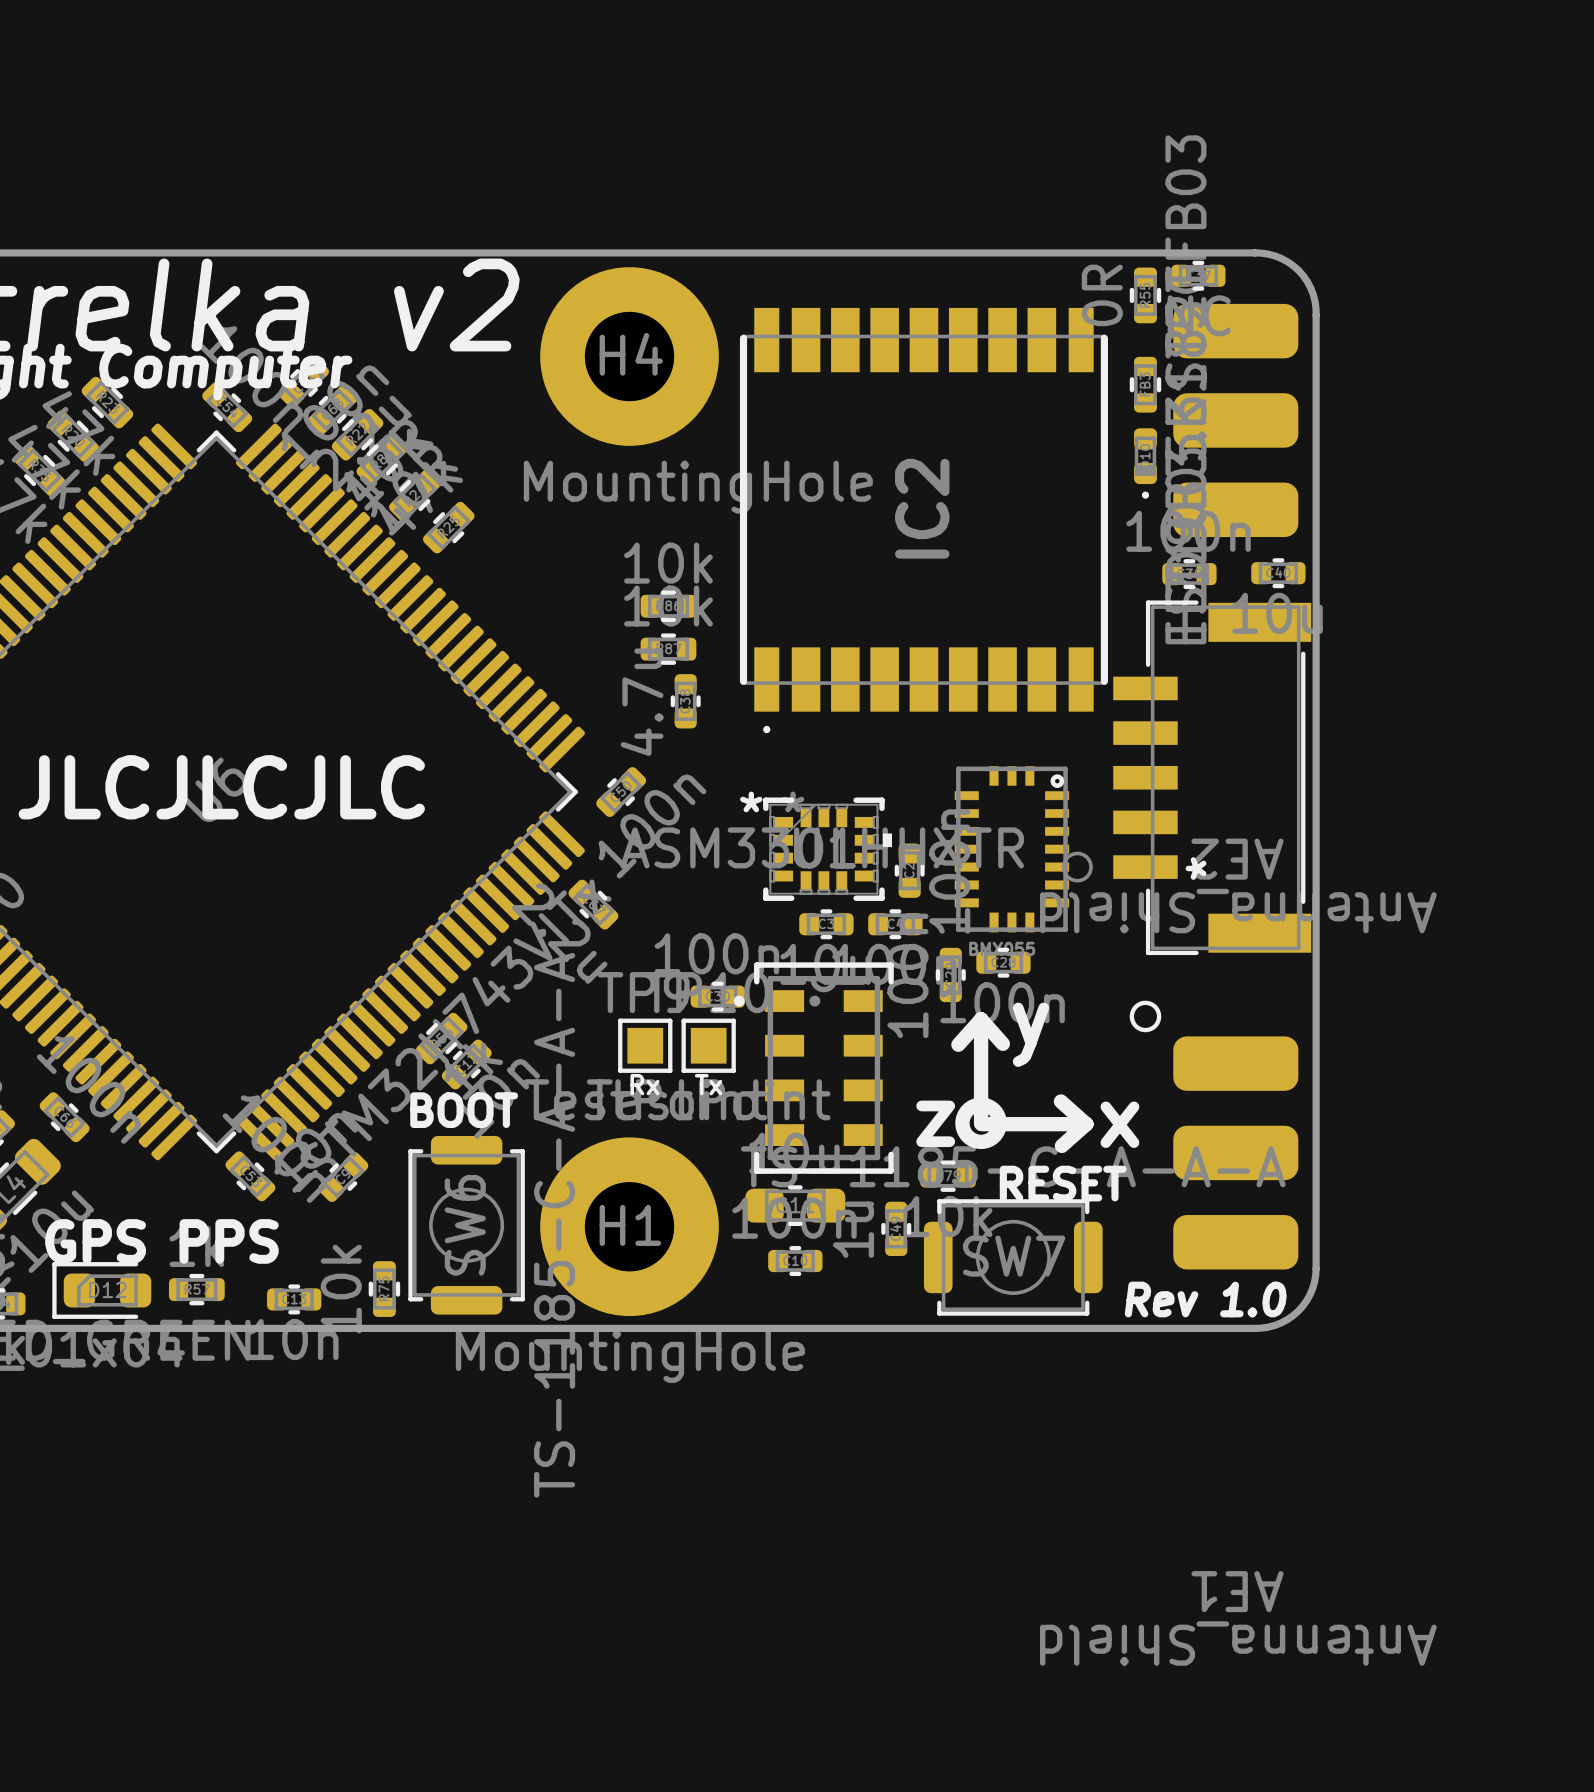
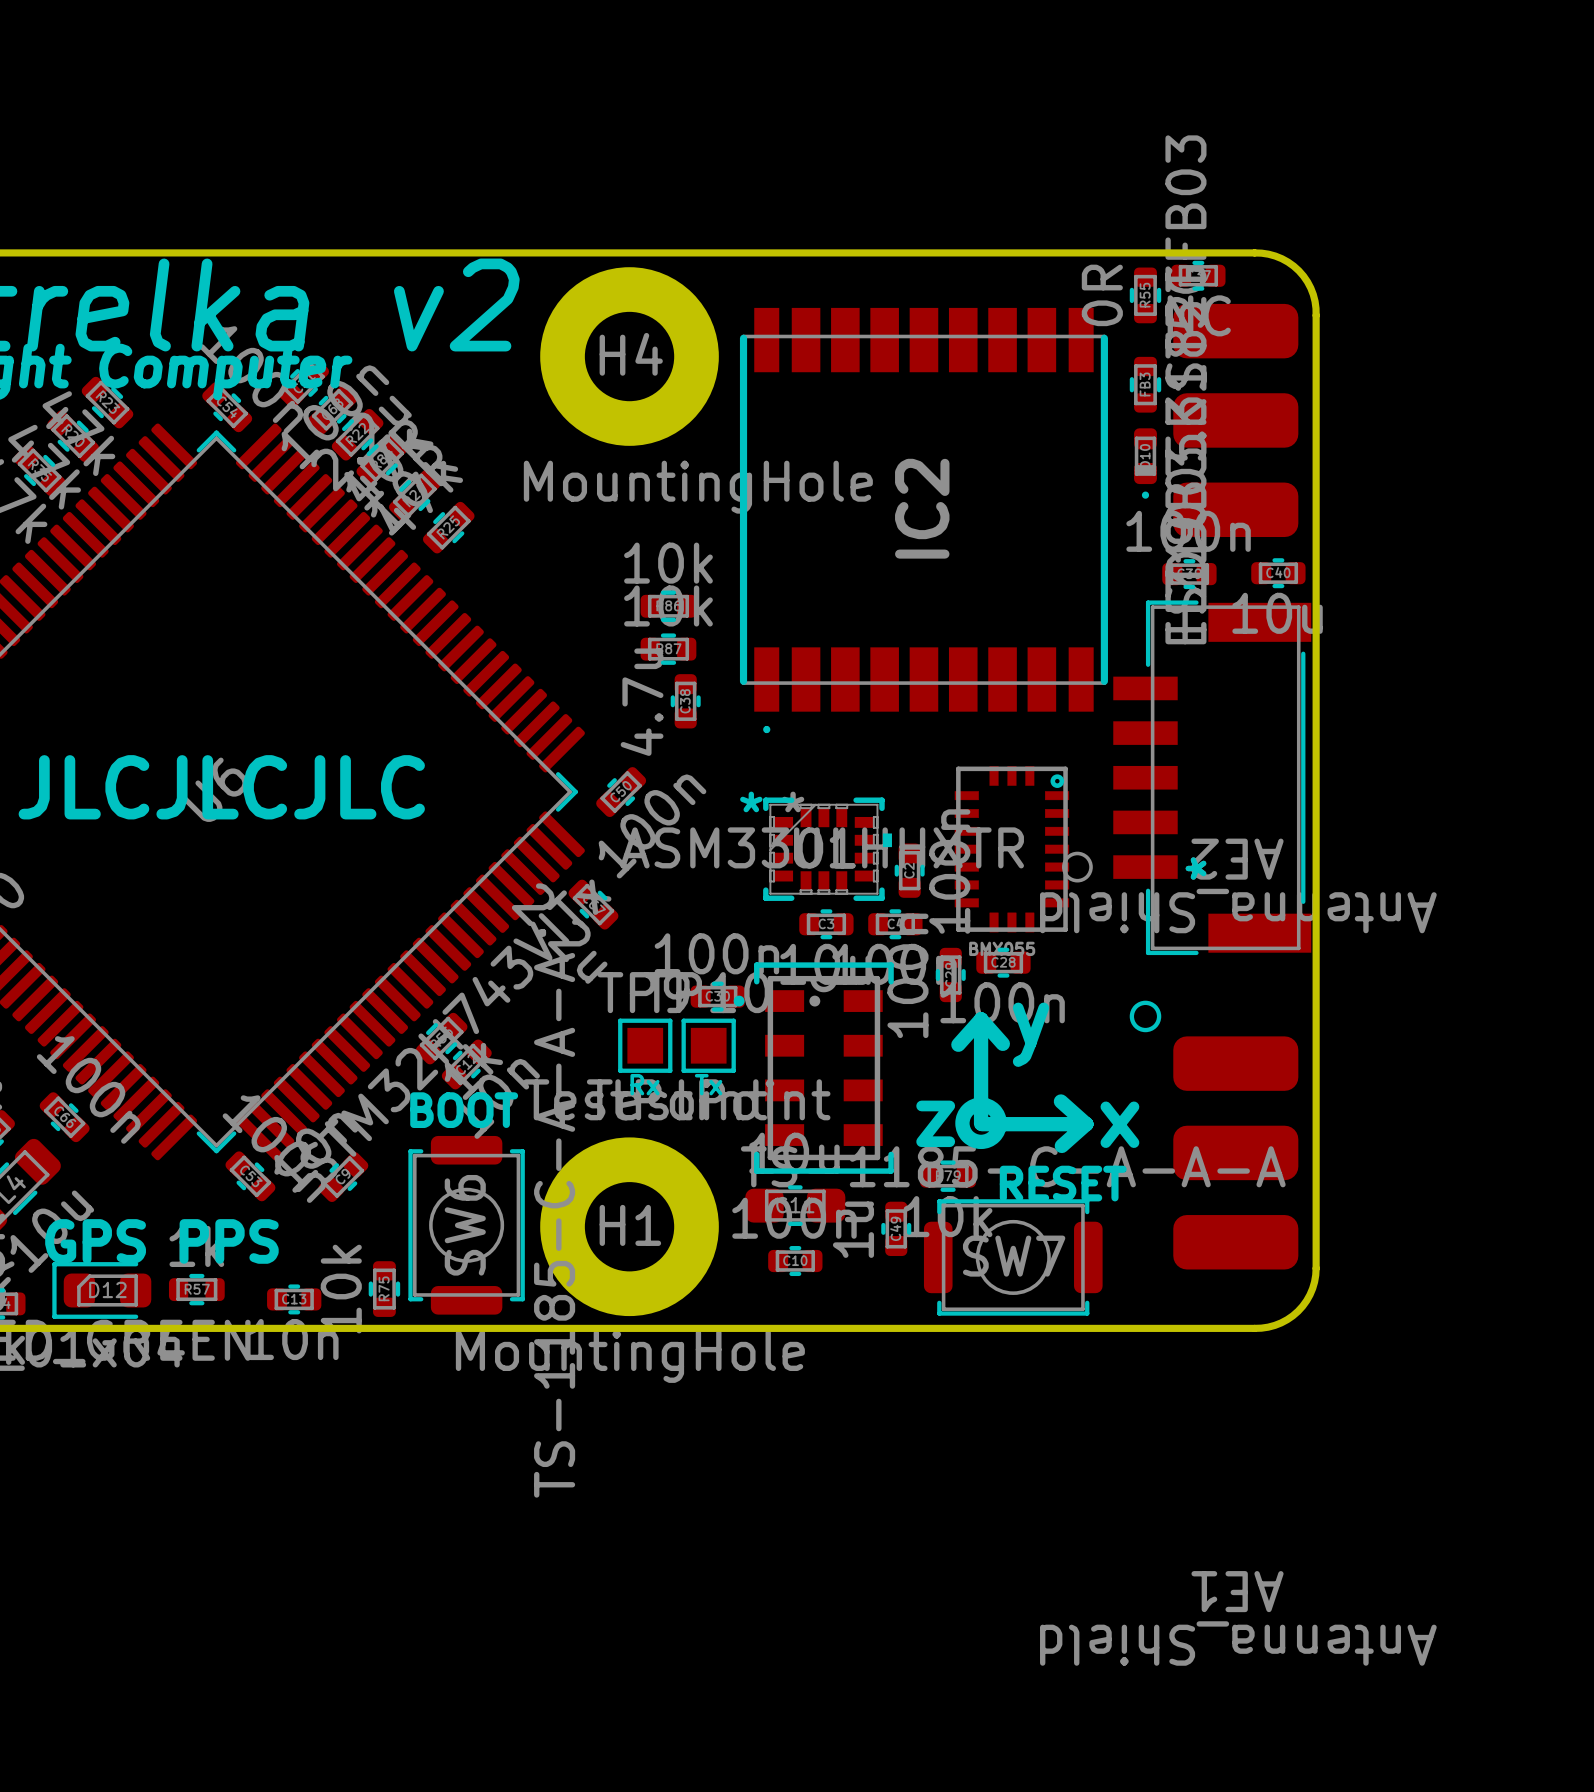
text: Rev 1.0 (1205, 1299) -> none

